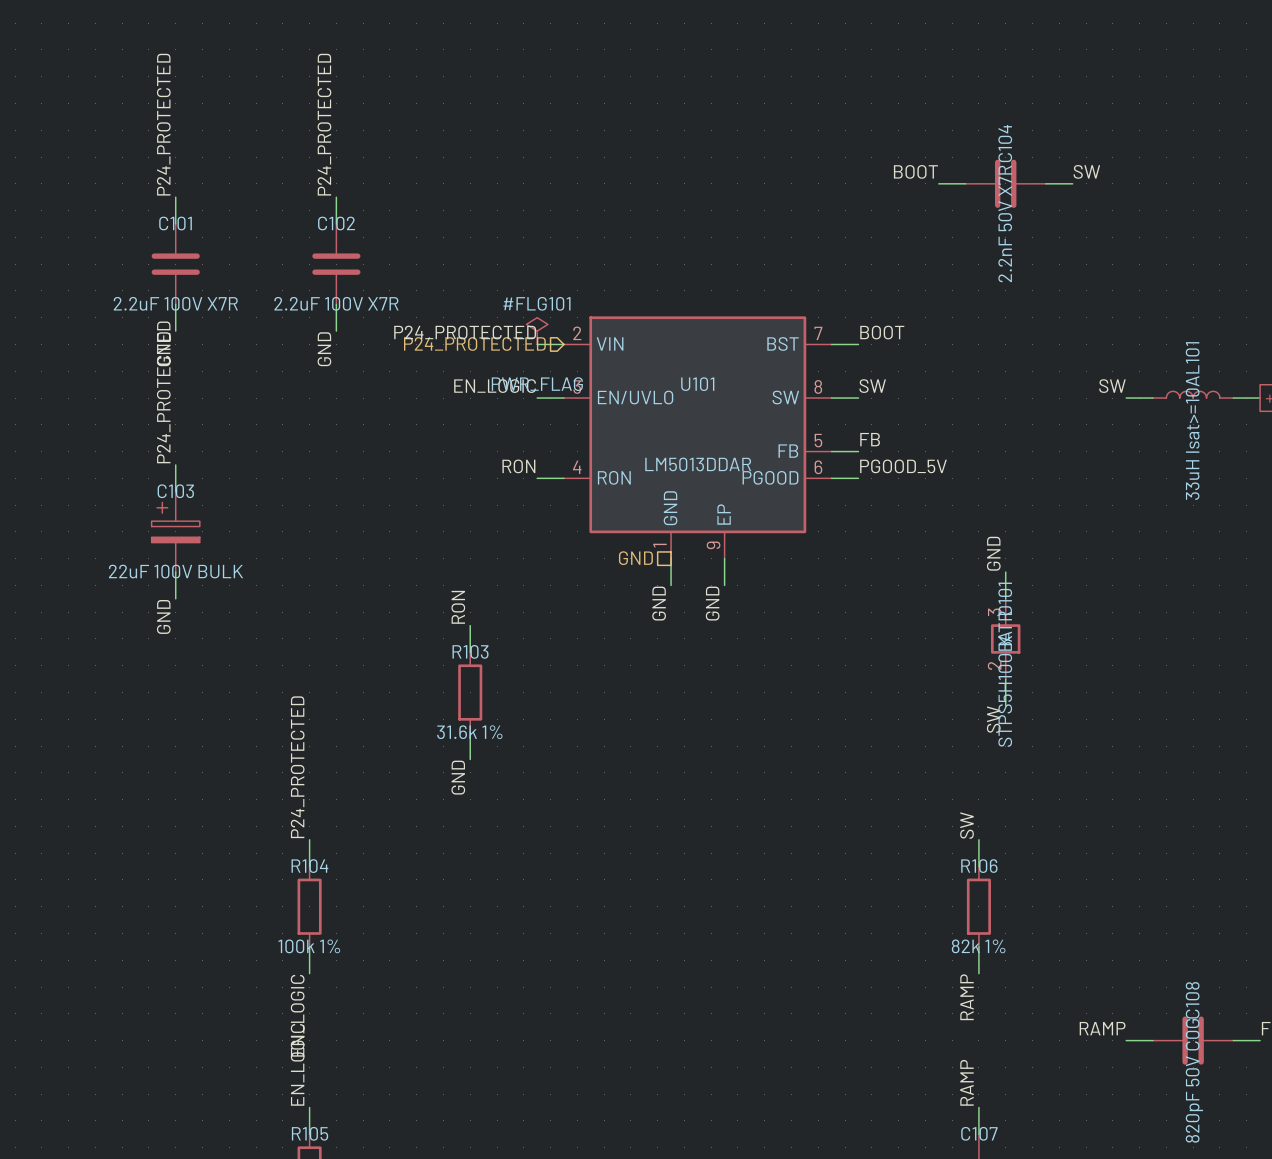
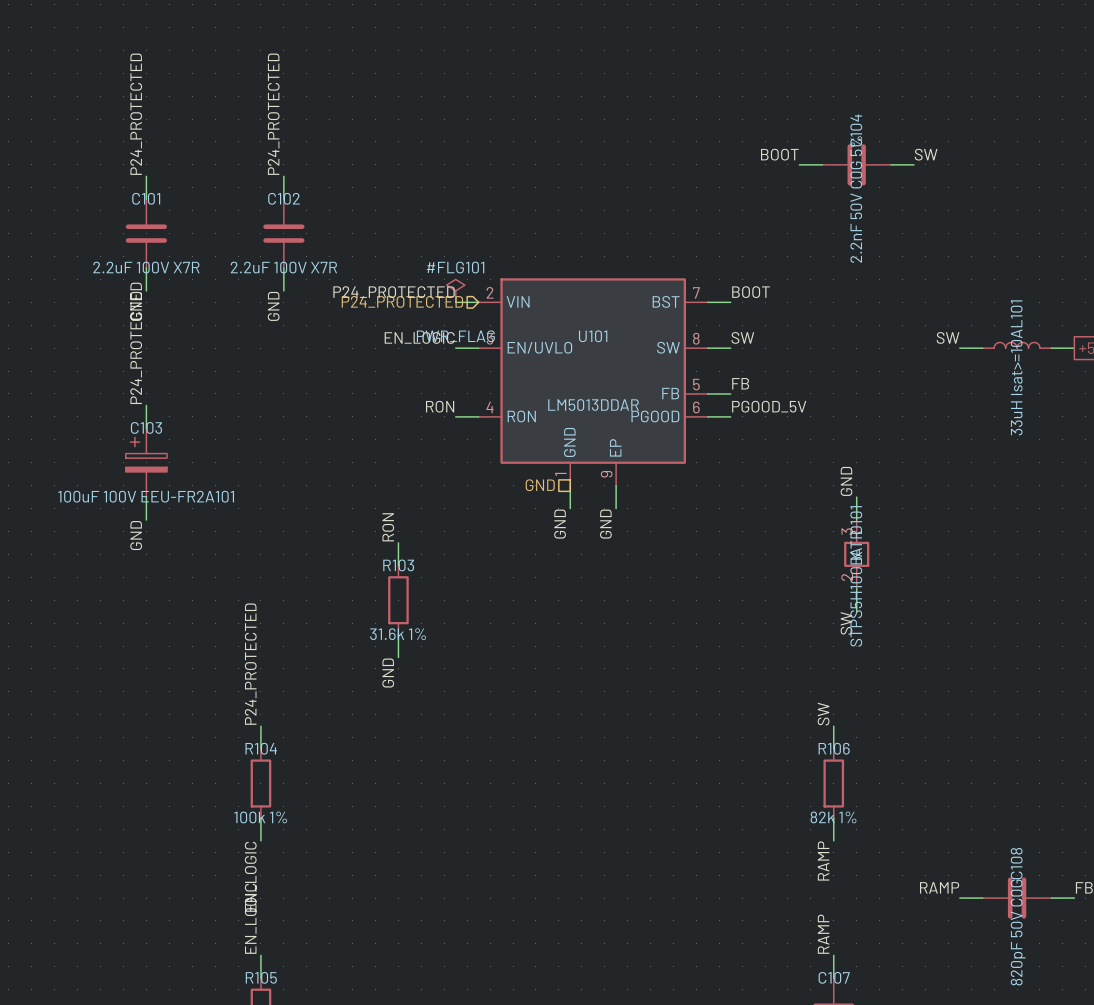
C104 value: 2.2nF 50V X7R (1005, 223) -> 2.2nF 50V C0G 5% (856, 199)
C103 value: 22uF 100V BULK (176, 571) -> 100uF 100V EEU-FR2A101 (146, 496)

